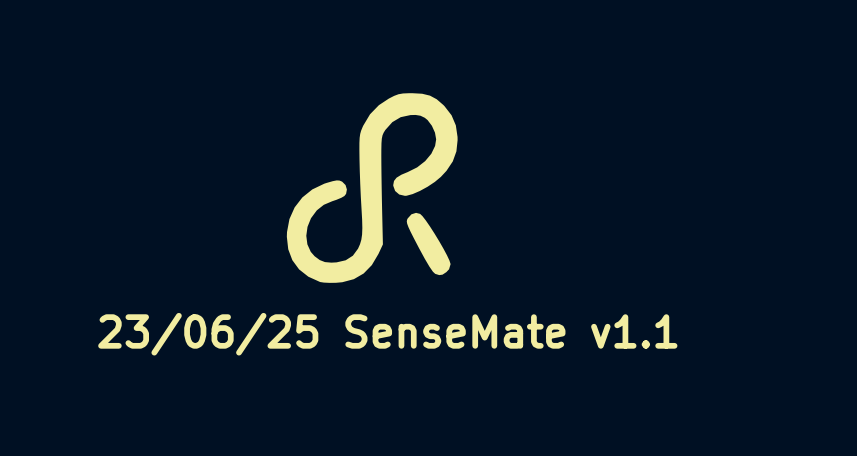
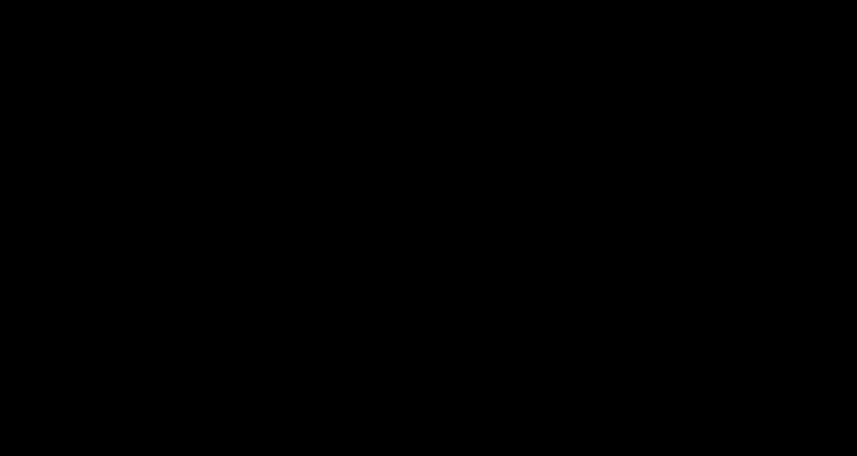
drawing: [286, 93, 458, 283] -> none
text: 23/06/25 SenseMate v1.1 (387, 334) -> none

